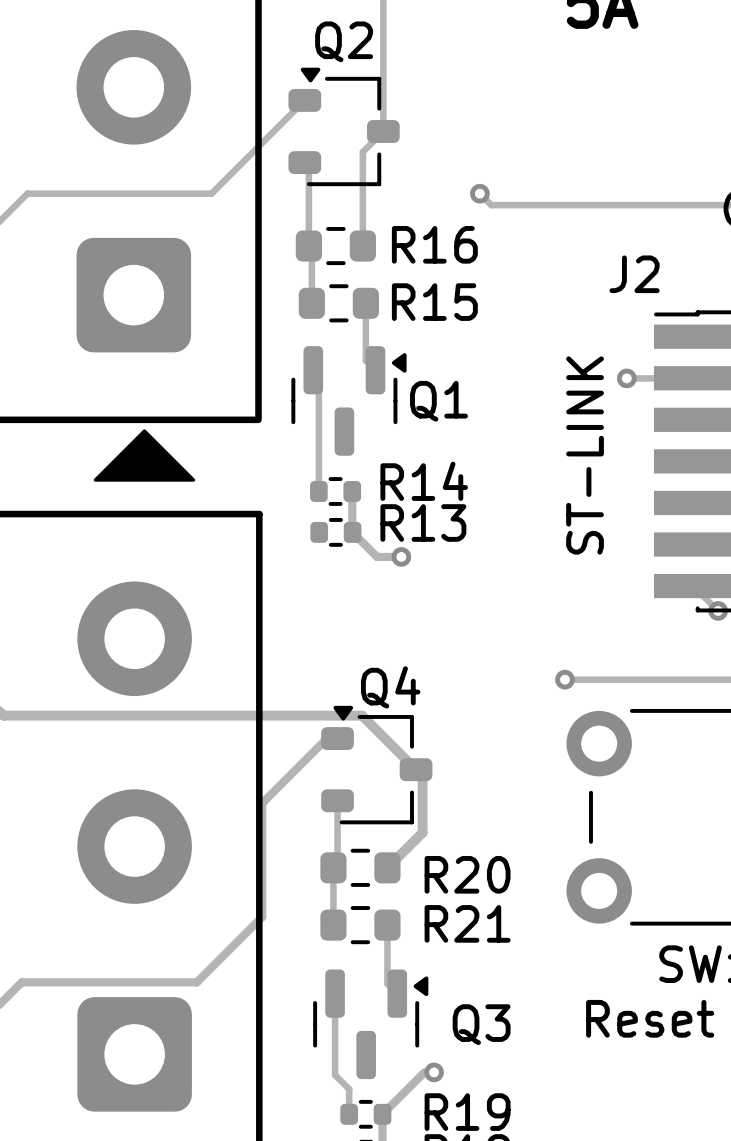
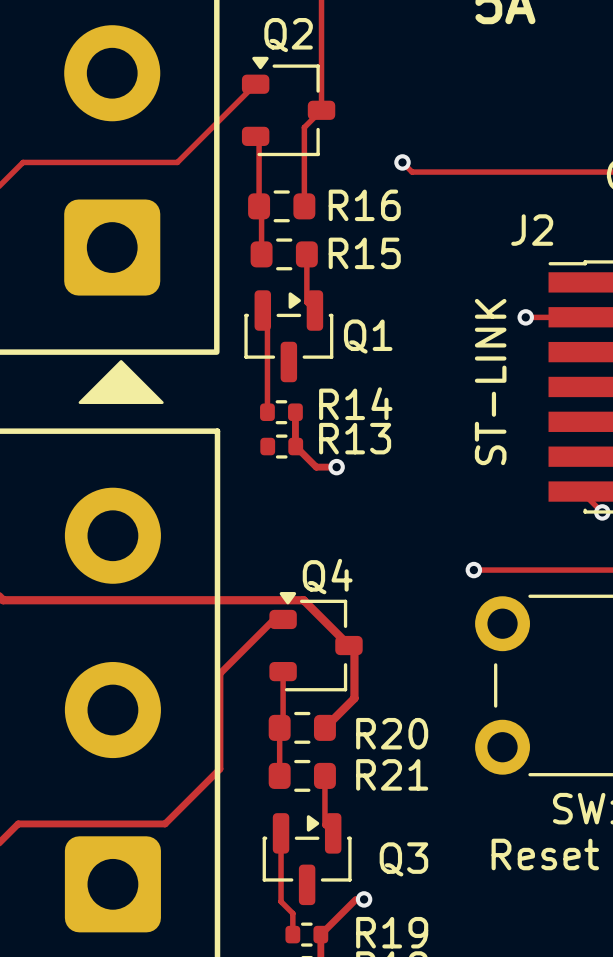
Q1 footprint: [291, 346, 407, 456] -> [244, 290, 334, 383]
Q3 footprint: [313, 969, 429, 1080] -> [262, 813, 352, 906]

